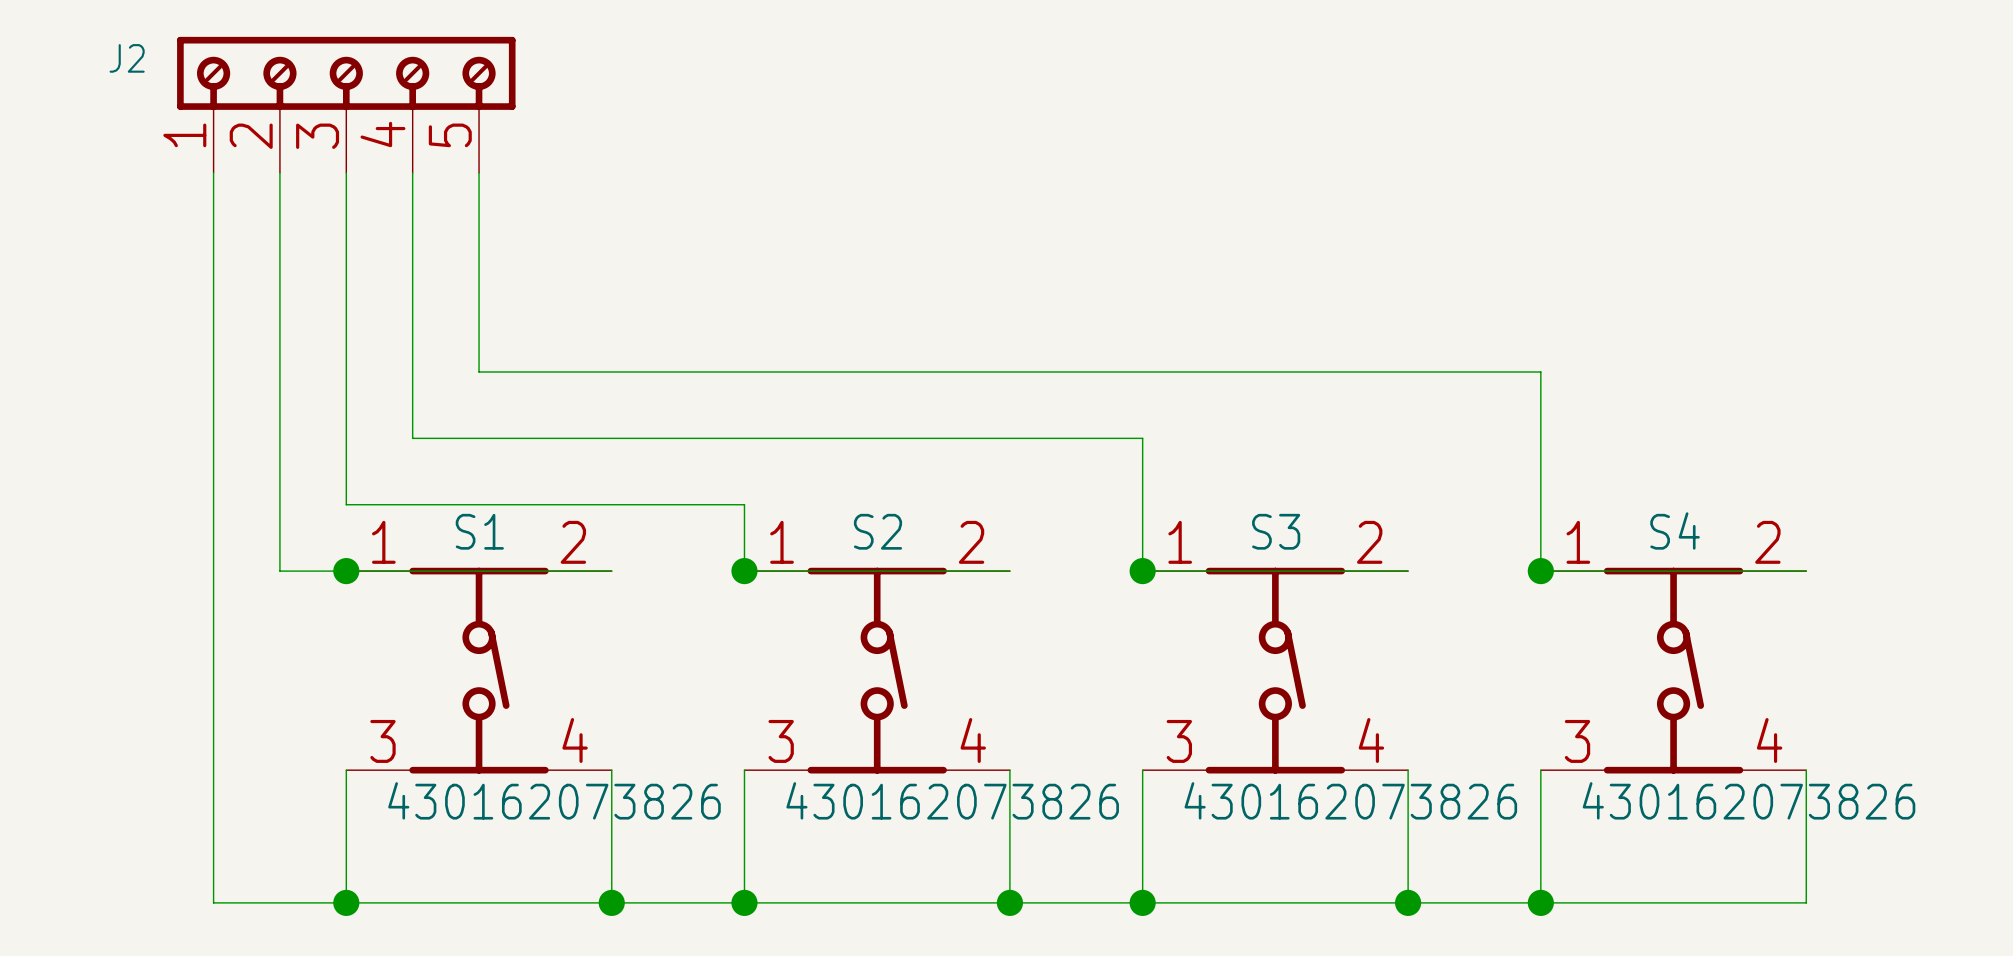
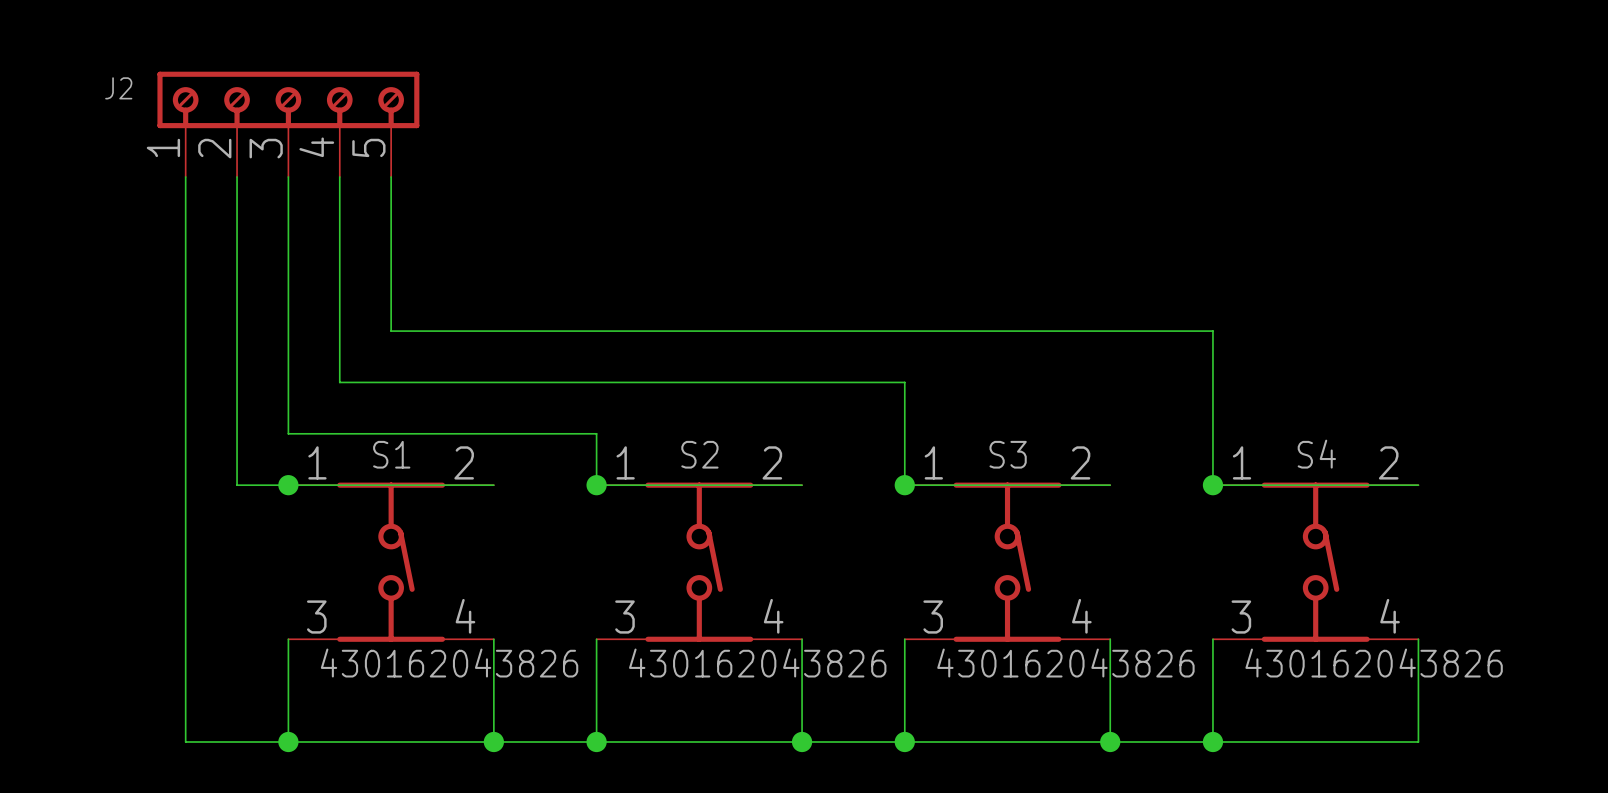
S1 value: 430162073826 (554, 800) -> 430162043826 (449, 663)
S2 value: 430162073826 (952, 800) -> 430162043826 (757, 663)
S3 value: 430162073826 (1350, 800) -> 430162043826 (1065, 663)
S4 value: 430162073826 (1749, 800) -> 430162043826 (1374, 663)

